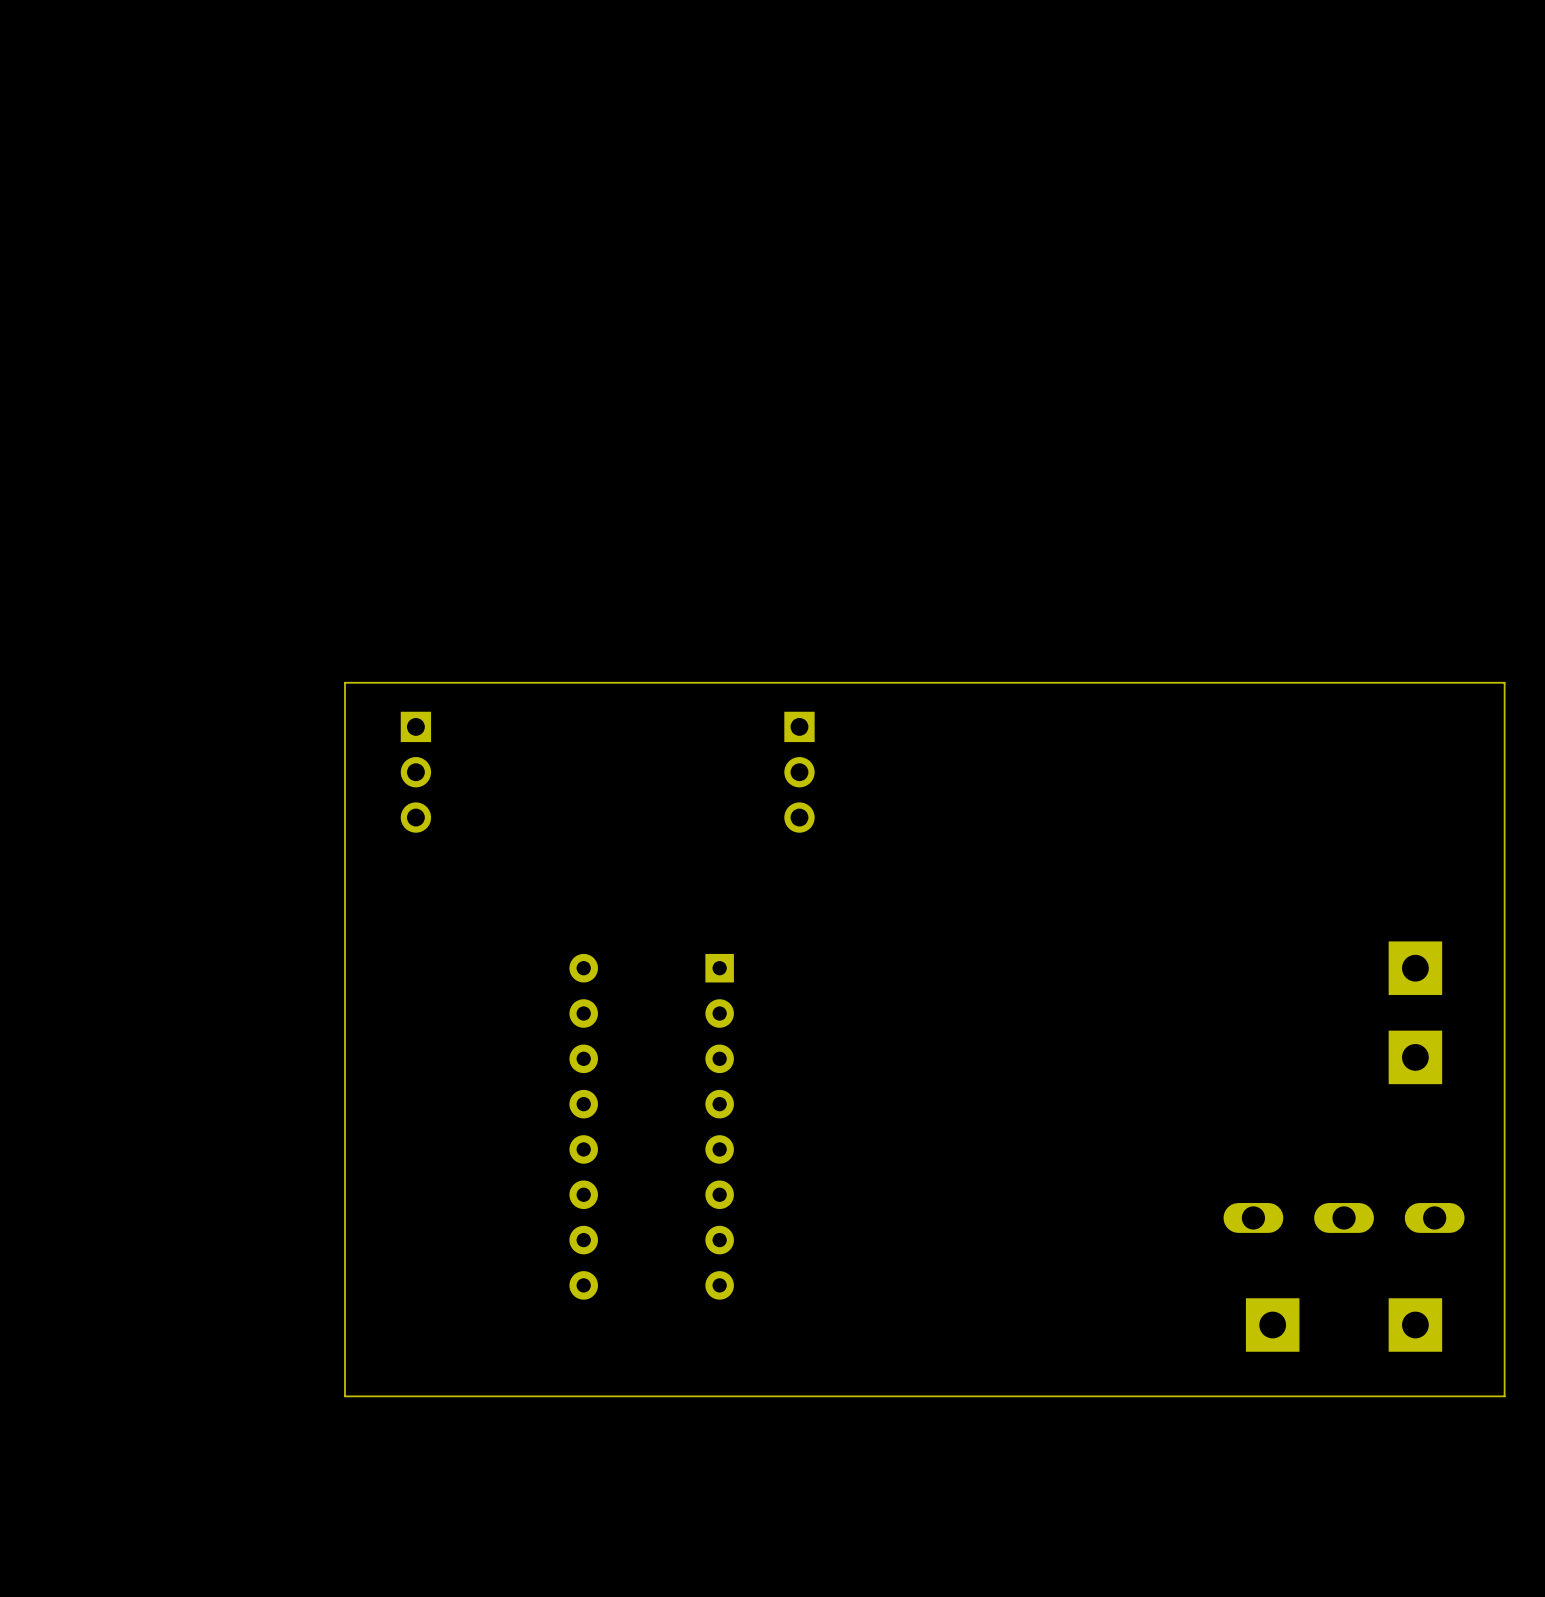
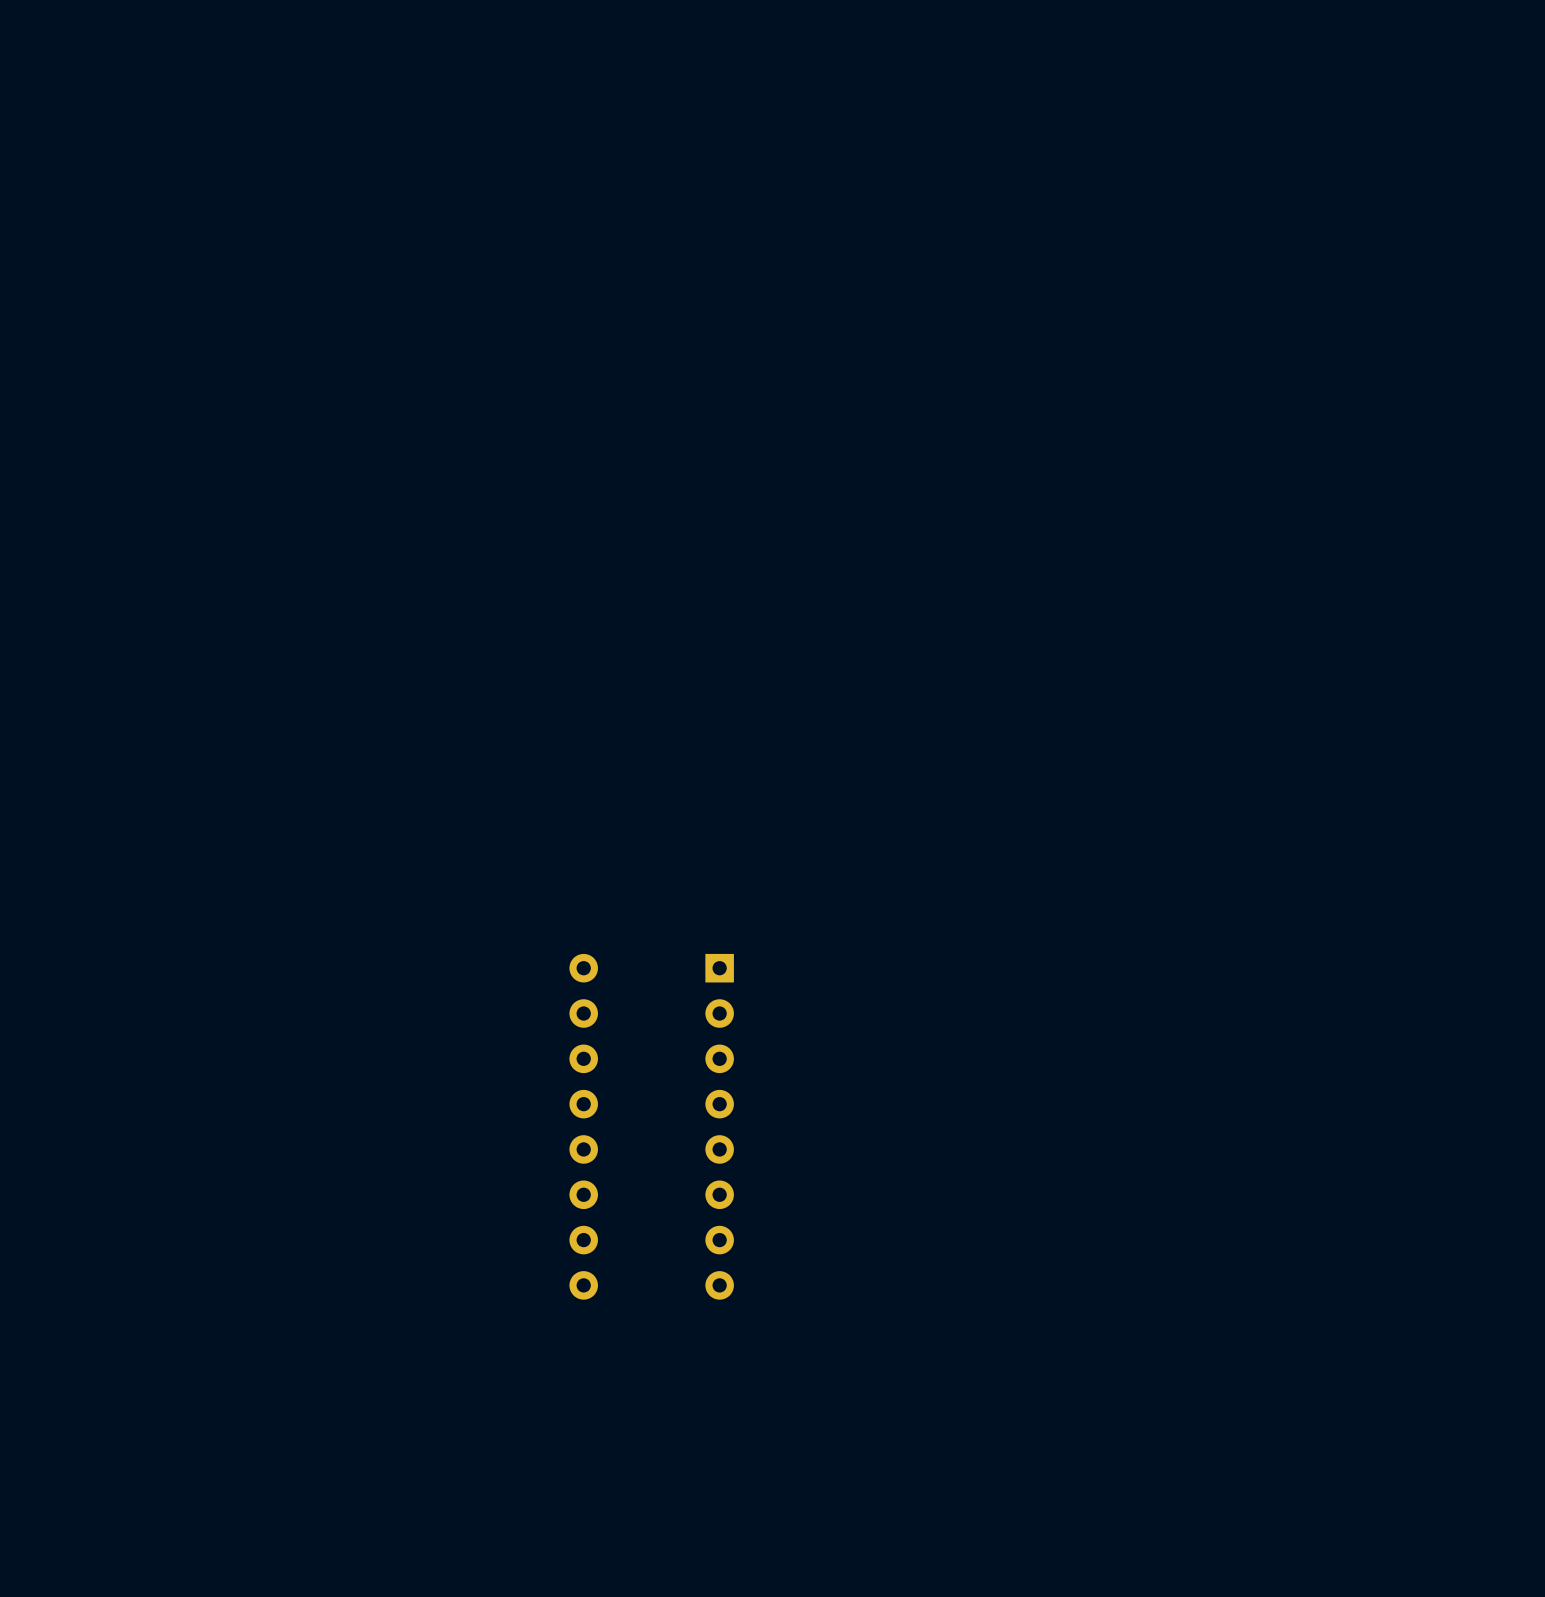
board edge: (1504, 682) (345, 682) (345, 1396) (1504, 1396) (1504, 682) -> none
part: (415, 772) -> none
part: (799, 772) -> none
part: (1415, 968) -> none
part: (1415, 1057) -> none
part: (1344, 1217) -> none
part: (1272, 1325) -> none
part: (1415, 1325) -> none

